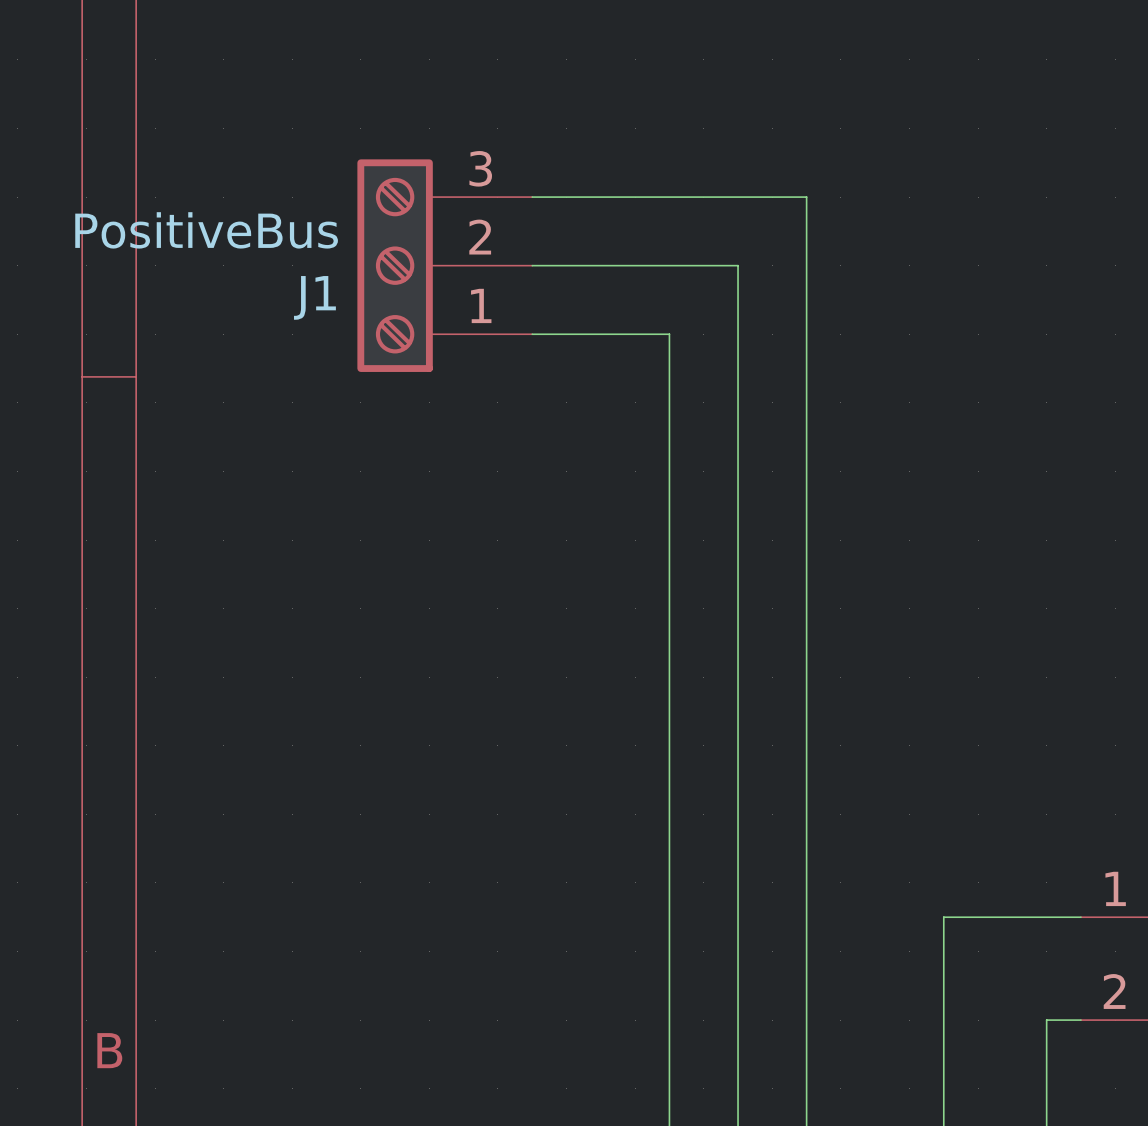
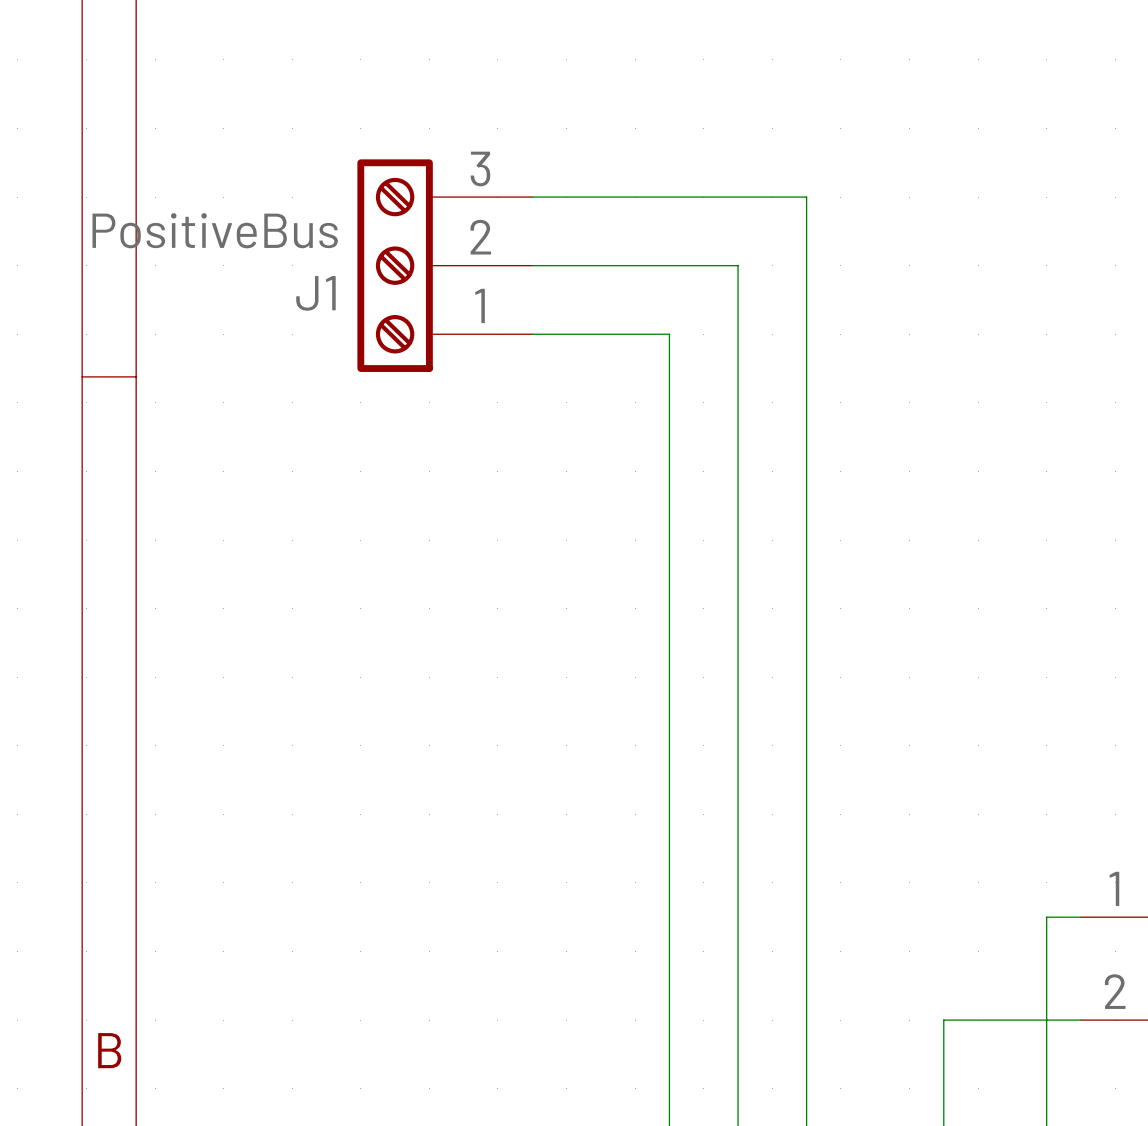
wire: (1046, 917) (943, 917) (943, 1020) -> (1046, 917) (1046, 1020) (943, 1020)

